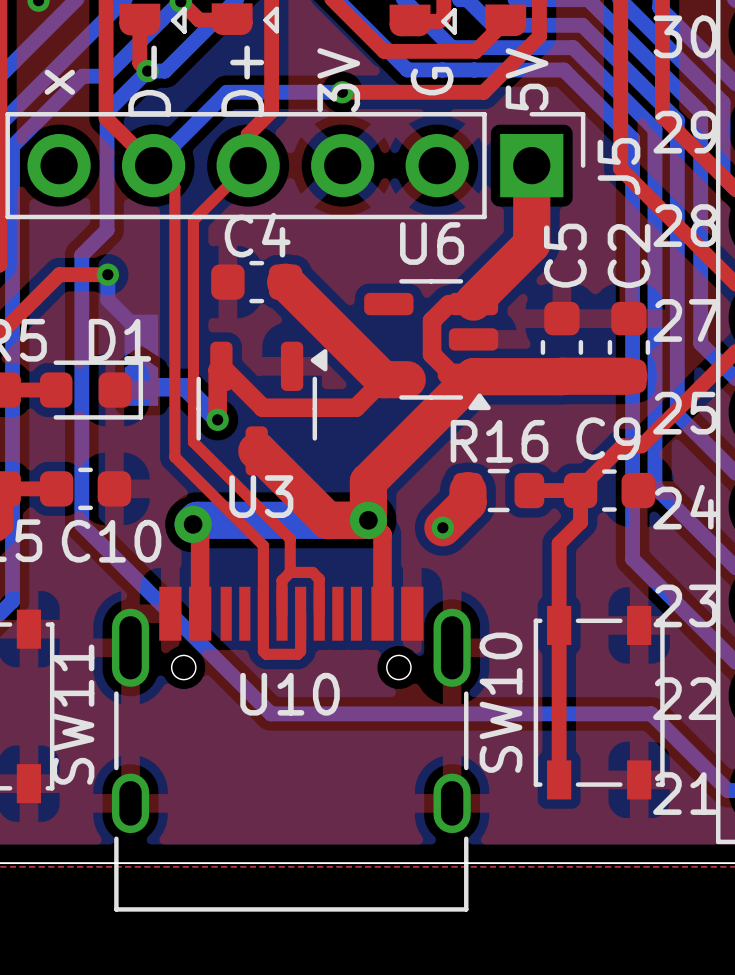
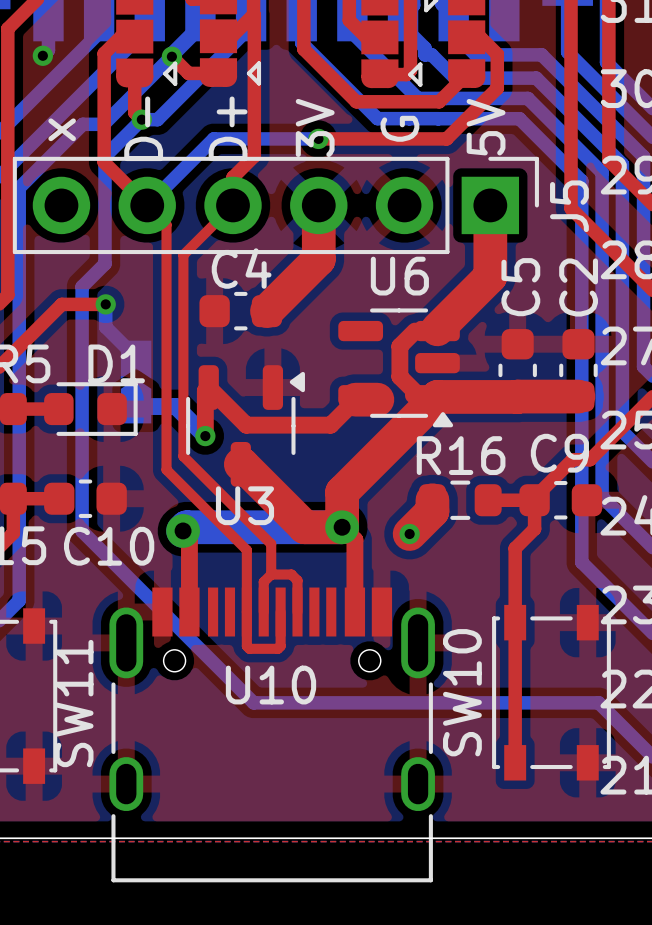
top track: (285, 282) (383, 379) -> (266, 311) (318, 259) (318, 205)

